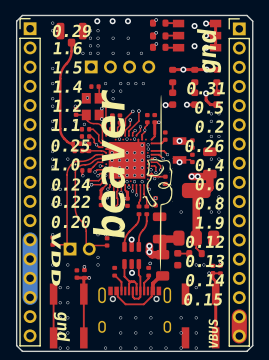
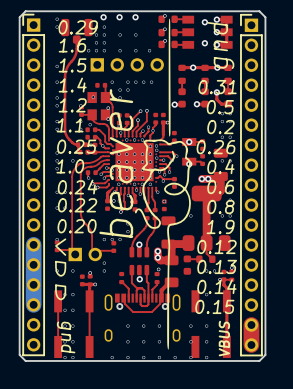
drawing shape: [142, 94, 173, 271] -> [134, 18, 192, 350]

